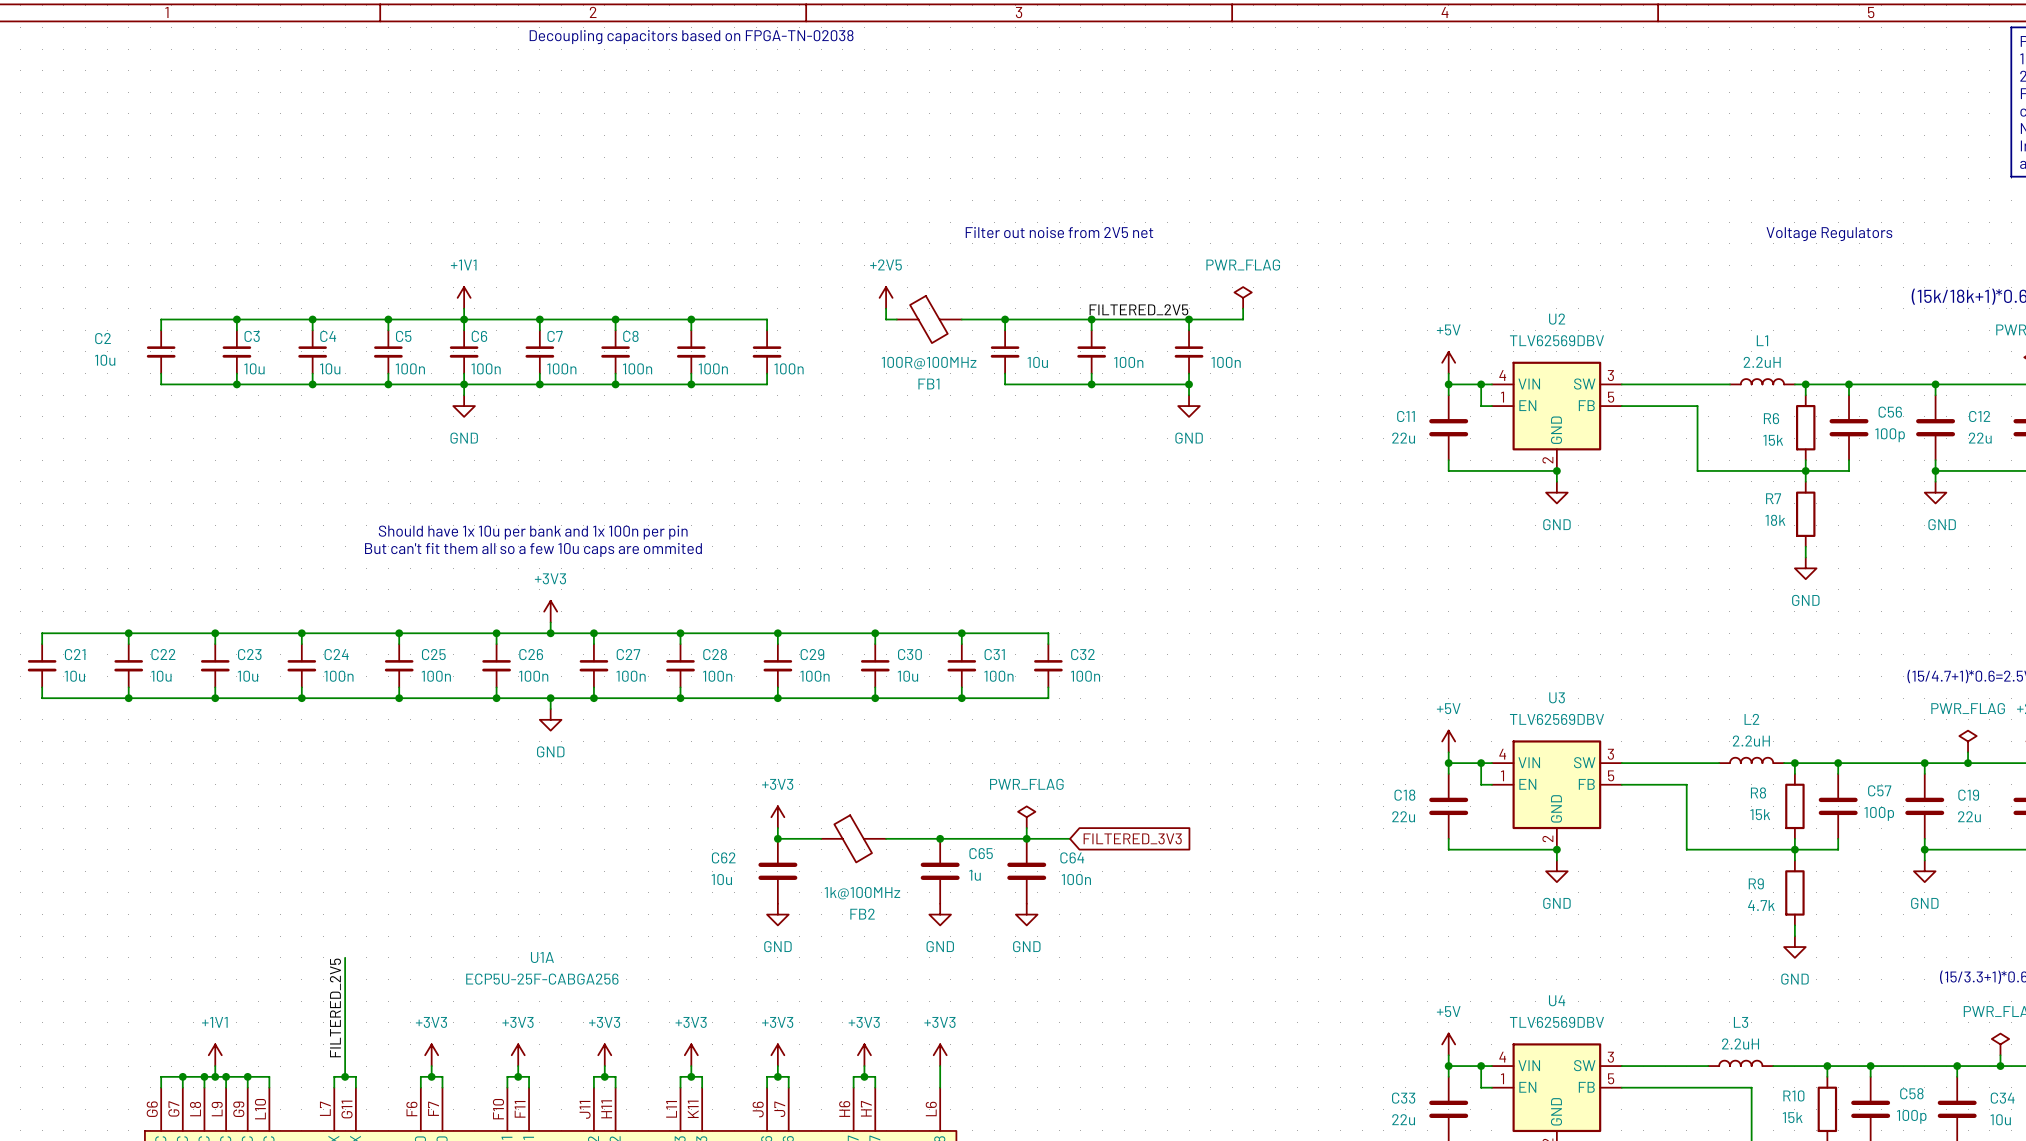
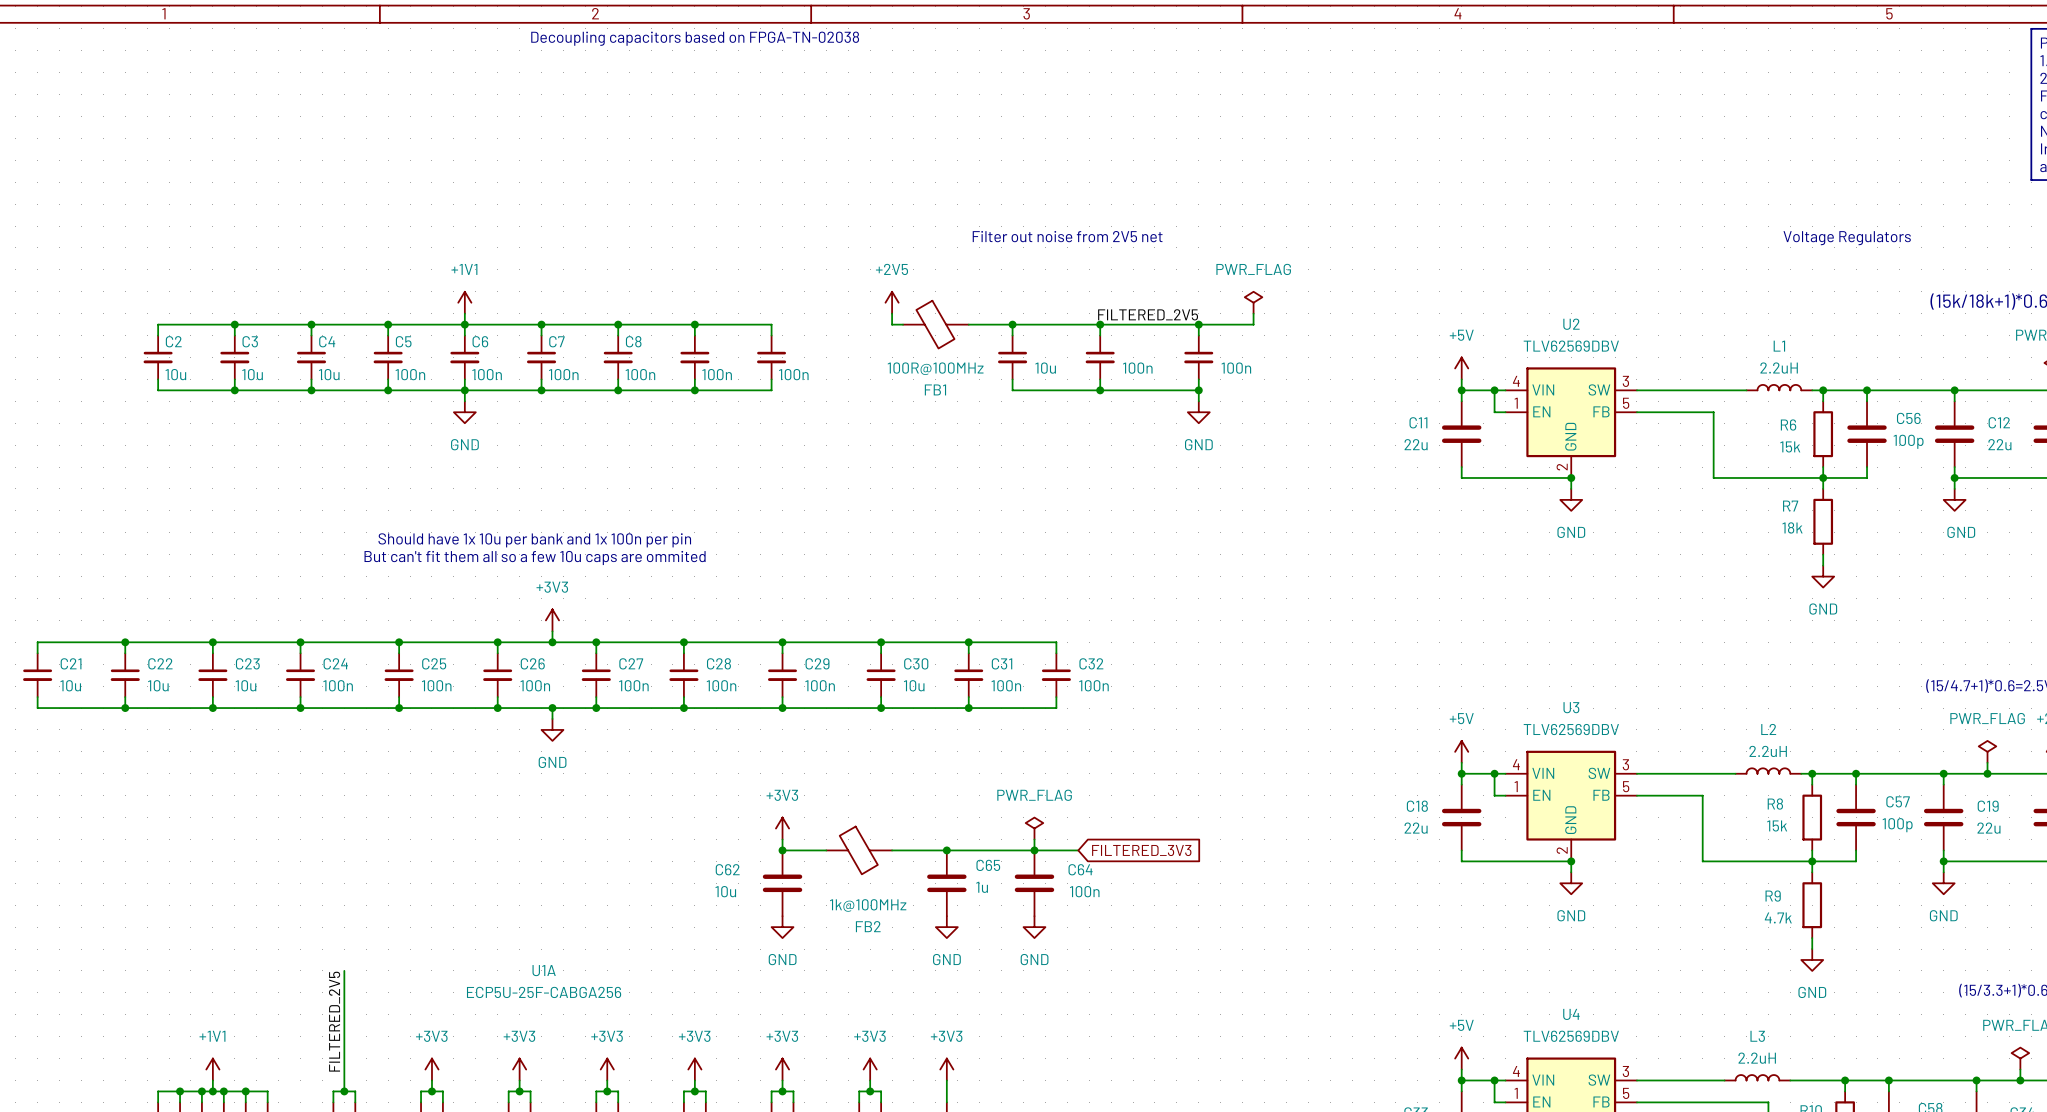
C2 name position: C2 (103, 338) -> C2 (173, 341)
C2 value position: 10u (105, 360) -> 10u (175, 374)

